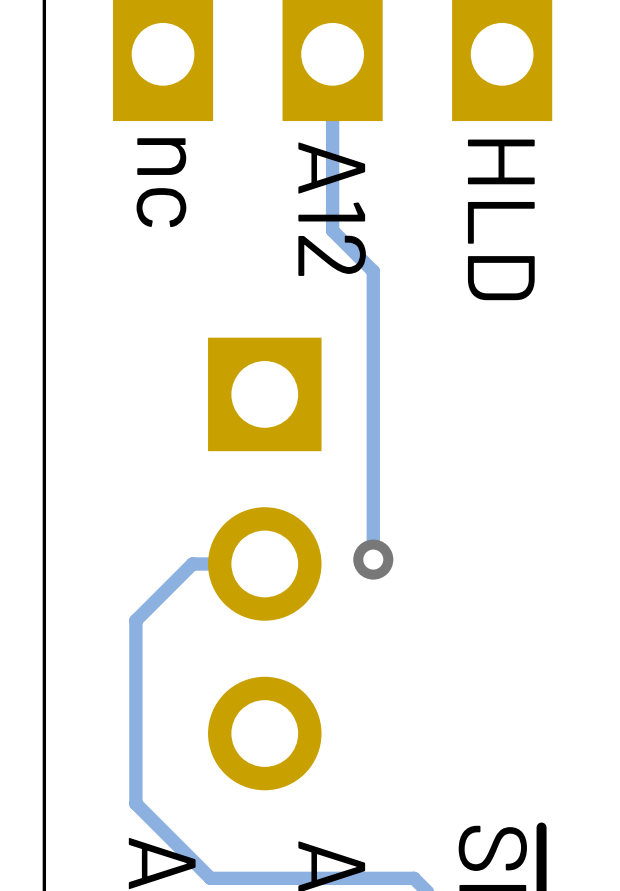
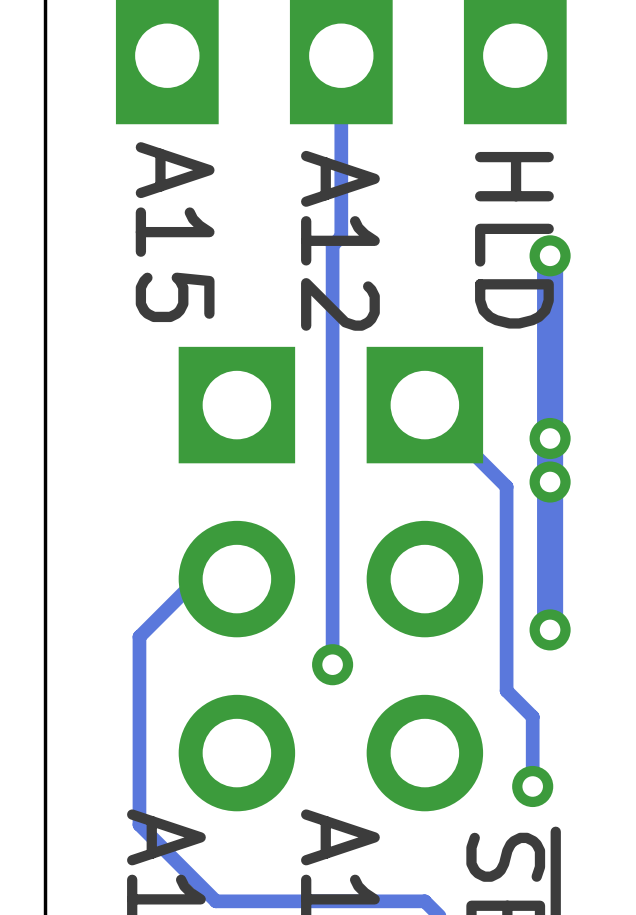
text: nc (161, 182) -> A15 (175, 232)
track: (332, 230) (373, 271) (373, 559) -> (341, 236) (332, 245) (332, 664)
track: none -> (550, 255) (550, 629)
via: none -> (550, 255)
track: none -> (424, 405) (506, 486) (506, 690) (532, 716) (532, 786)
via: none -> (550, 438)
via: none -> (550, 482)
via: (373, 559) -> none
part position: (264, 563) -> (236, 579)
part: none -> (424, 579)
via: none -> (550, 629)
via: none -> (332, 664)
via: none -> (532, 786)

